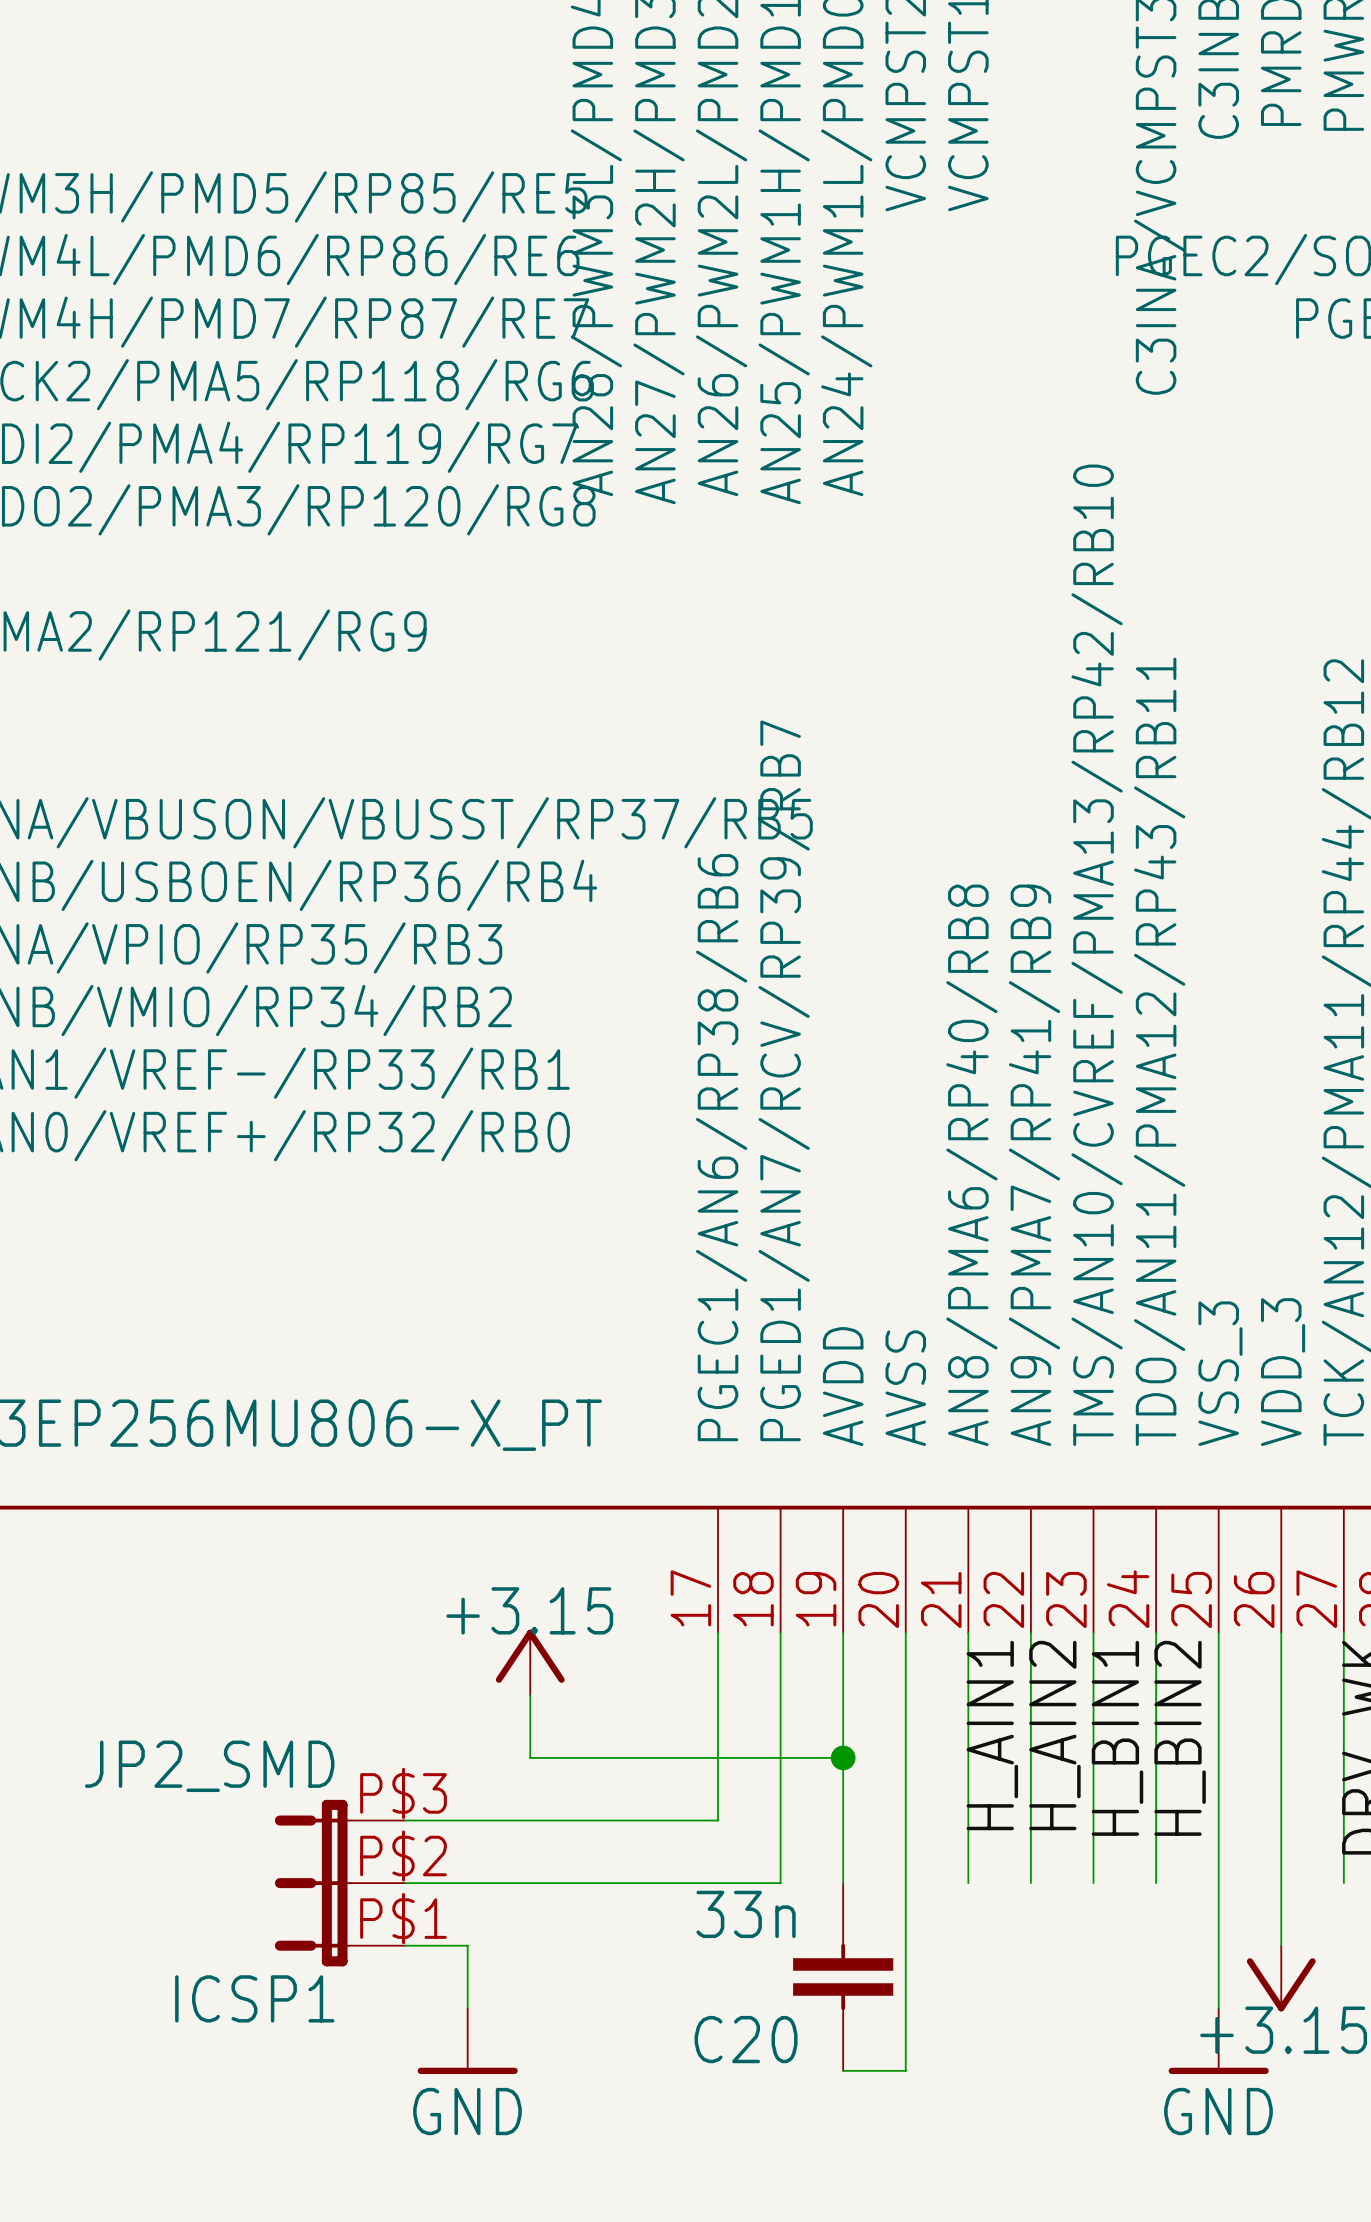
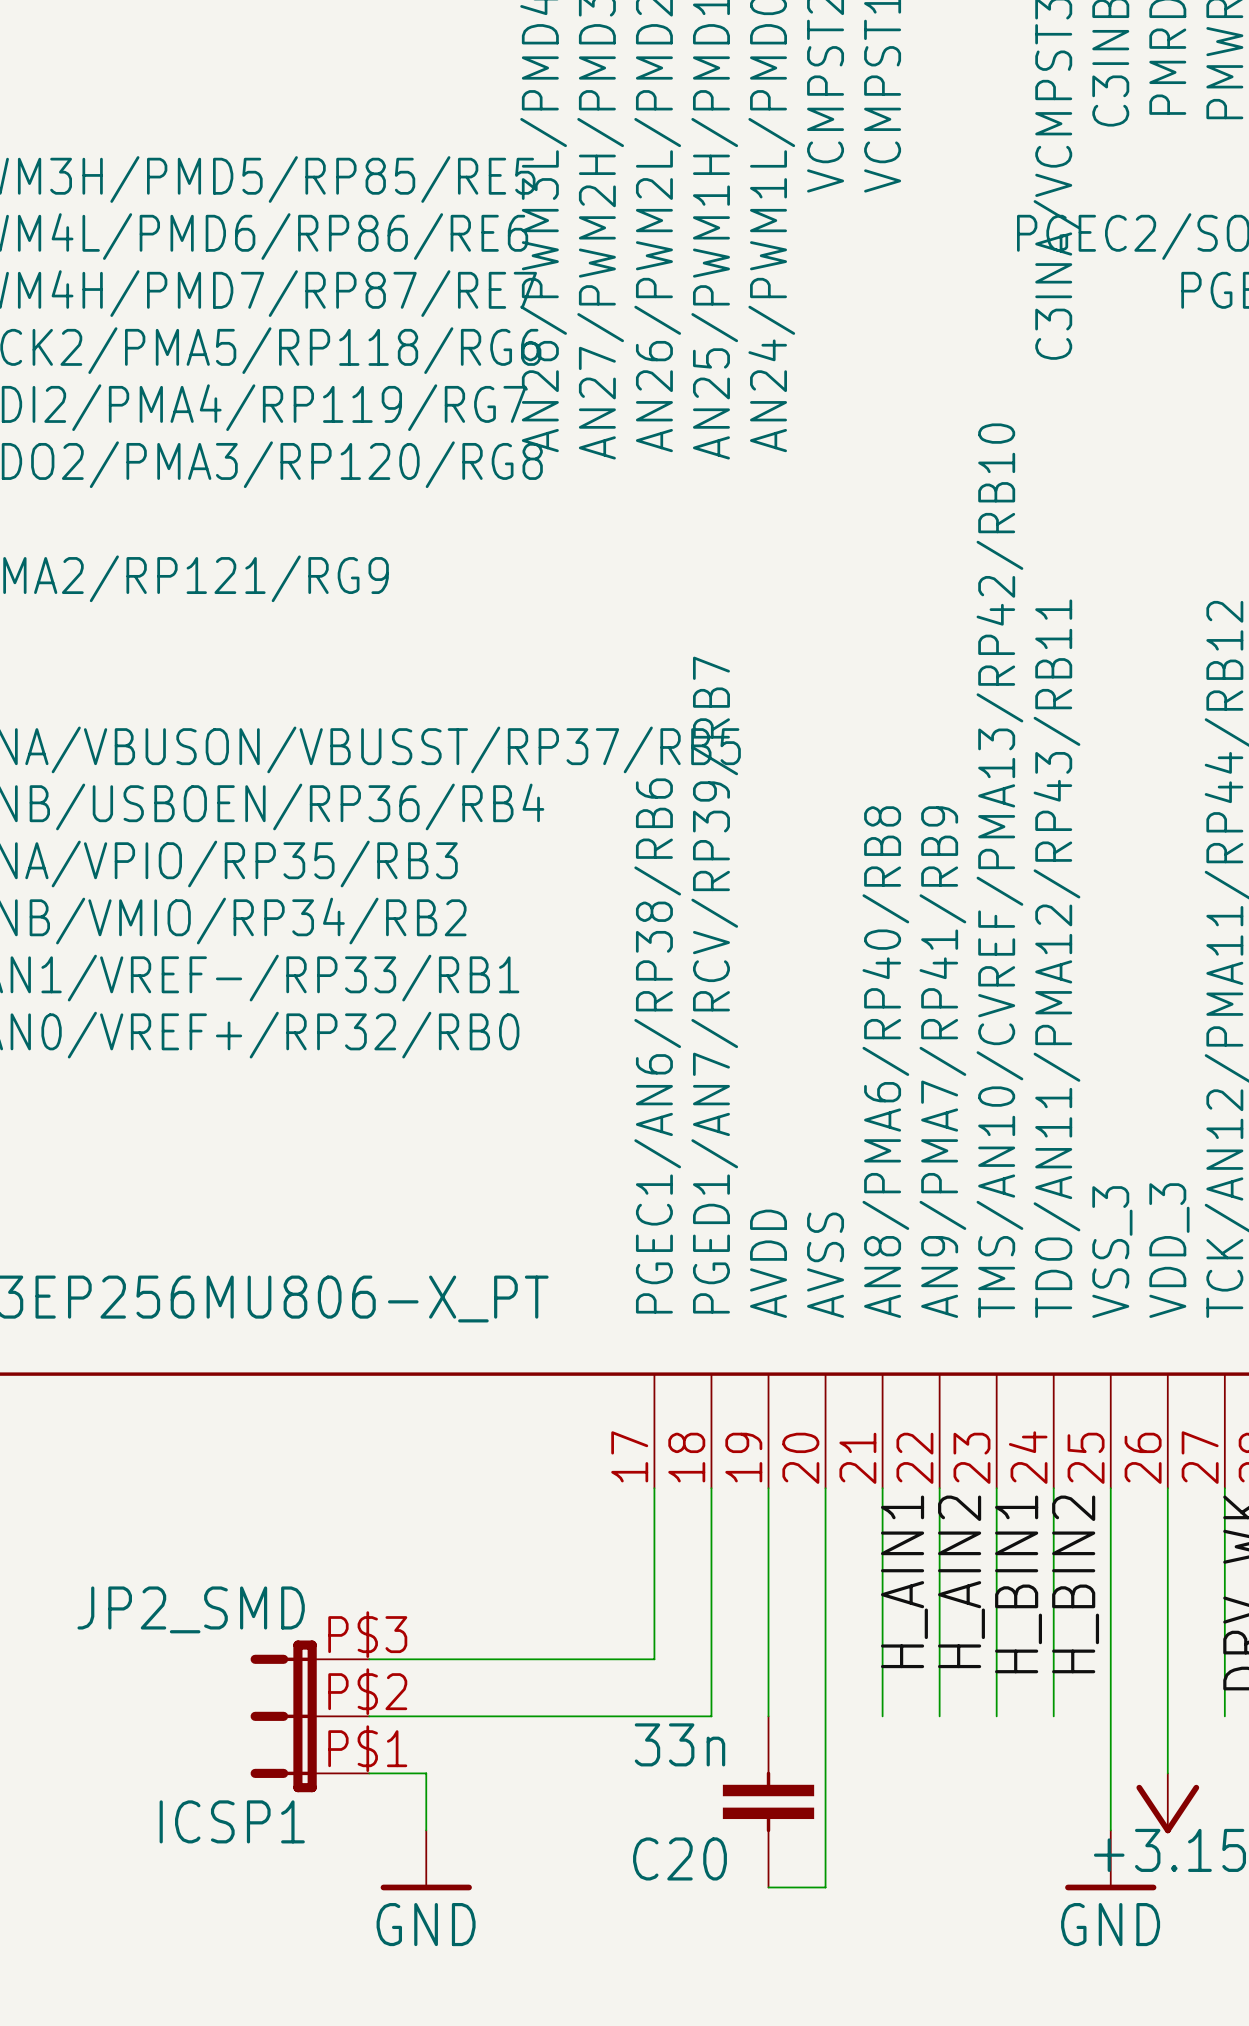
power symbol: +3.15 (530, 1662) -> none
wire: (530, 1695) (530, 1757) (843, 1757) -> none
junction: (843, 1757) -> none

